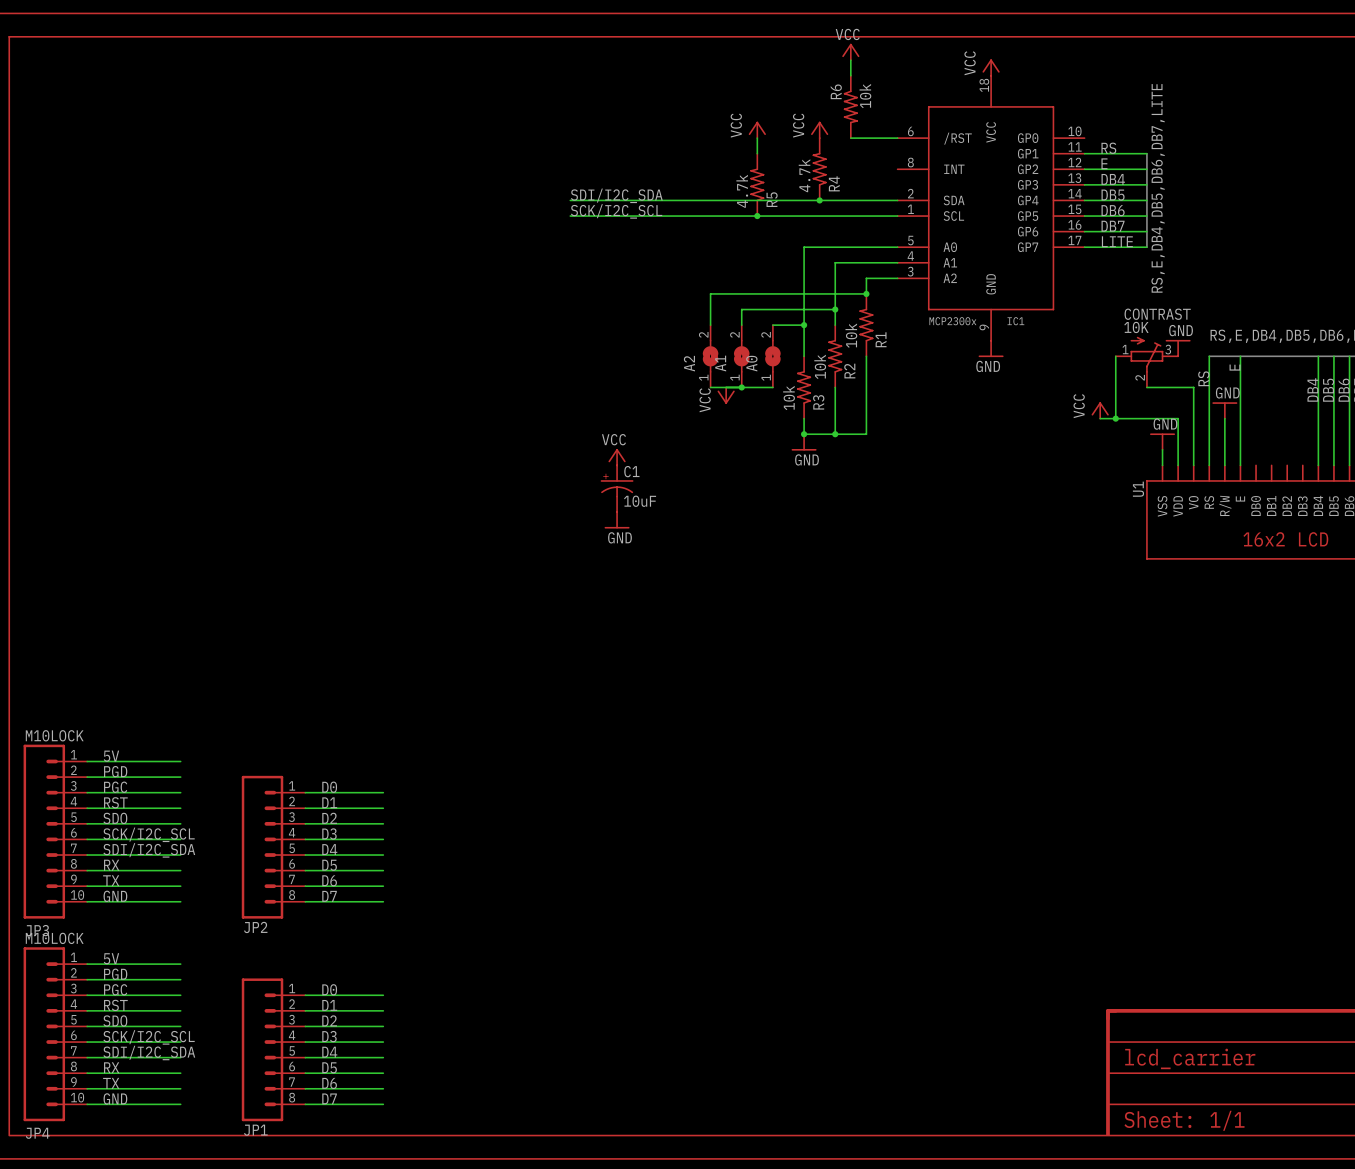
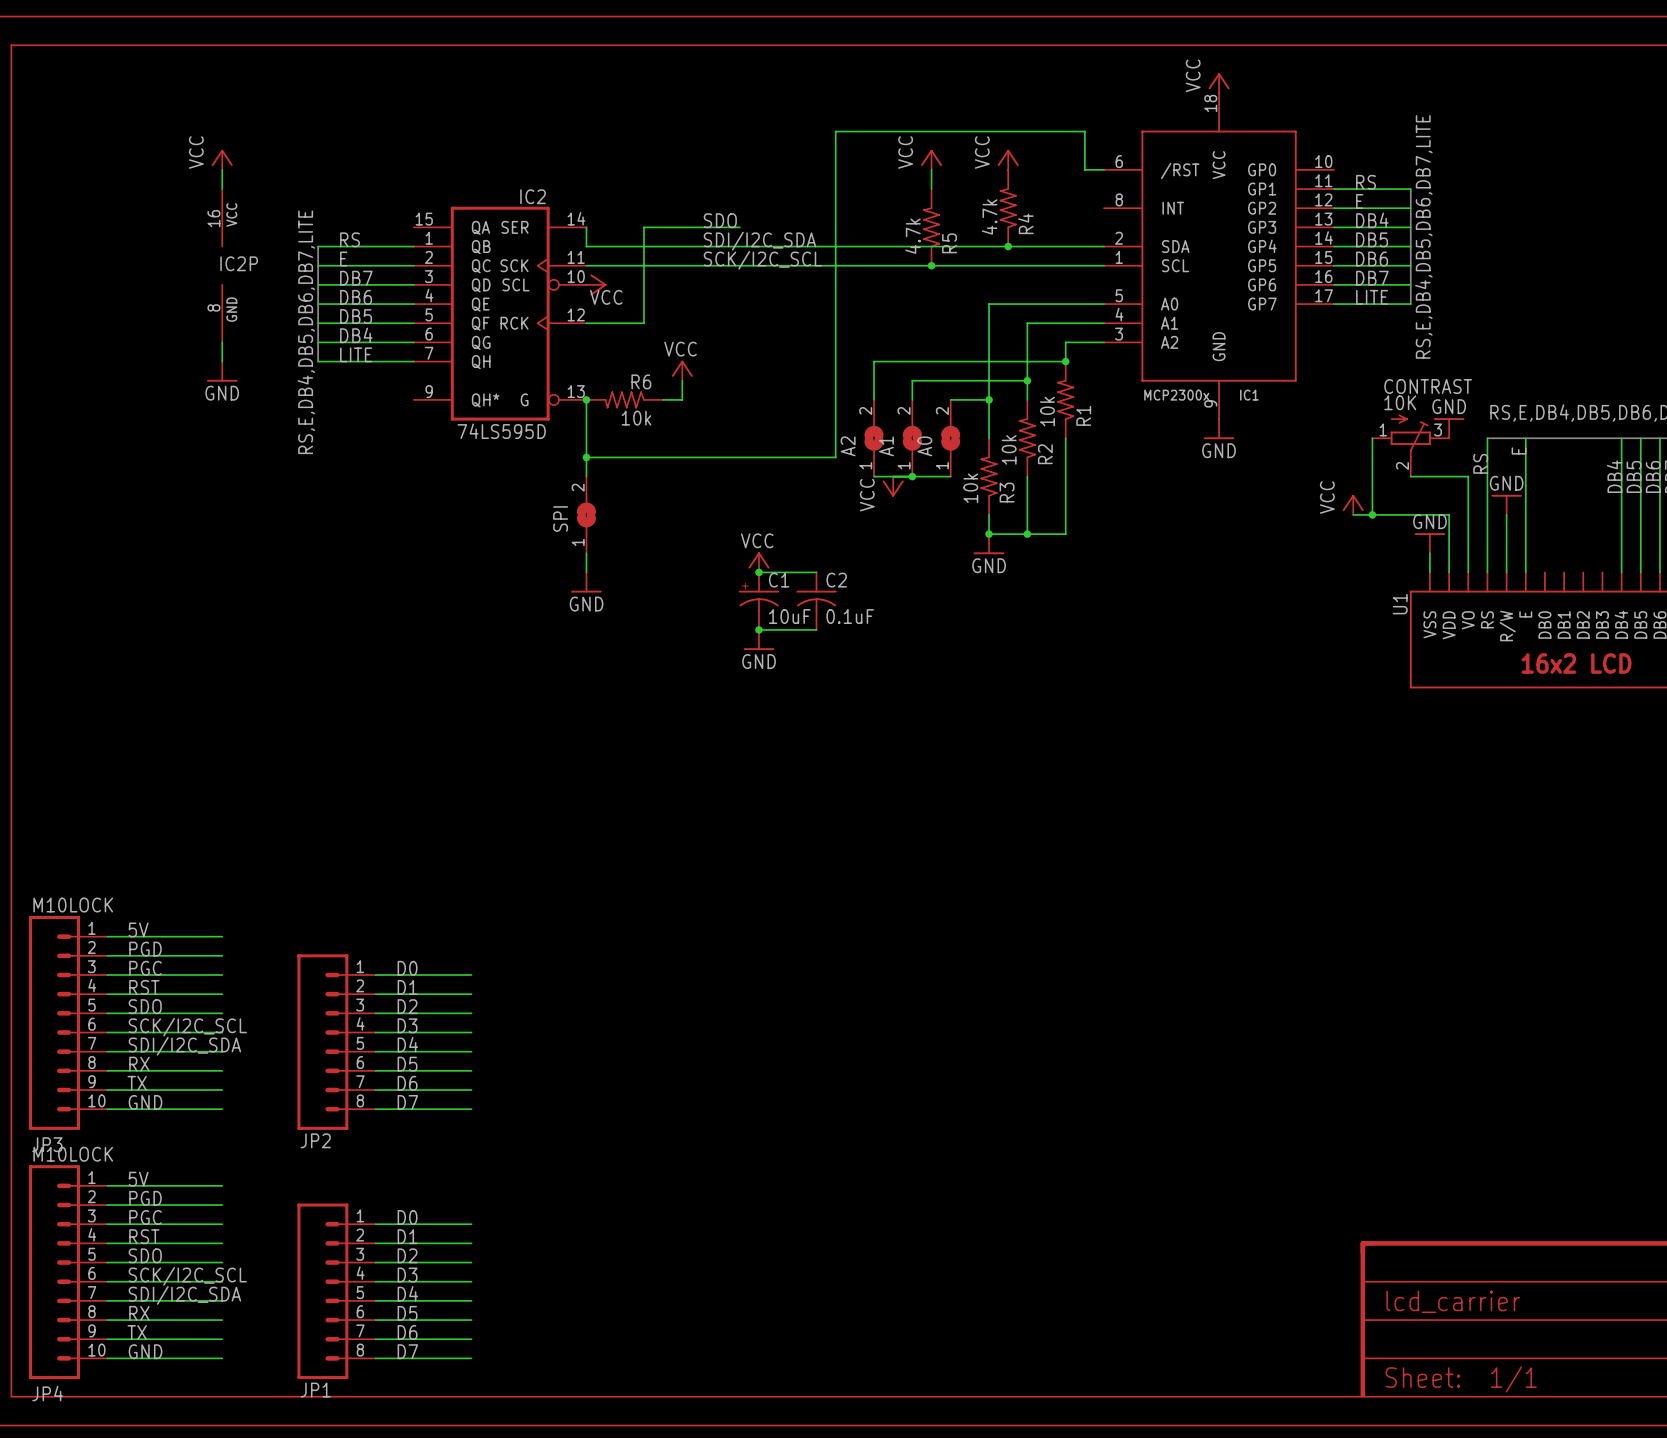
power symbol: VCC (850, 52) -> none
wire: (850, 60) (850, 75) -> none
R6 rotation: 0° (850, 106) -> 90° clockwise (624, 399)
R6 position: (850, 106) -> (624, 399)
power symbol: none -> VCC (222, 159)
wire: none -> (222, 169) (222, 189)
wire: (850, 138) (882, 138) -> (586, 457) (835, 457) (835, 131) (1084, 131) (1084, 169)
label: none -> SDO (720, 220)
wire: none -> (586, 227) (586, 246) (701, 246)
wire: none -> (739, 227) (643, 227) (643, 323) (586, 323)
label: none -> RS (350, 239)
bus: none -> (318, 246) (318, 361)
wire: none -> (318, 246) (413, 246)
label: none -> E (343, 259)
IC2P: none -> (222, 265)
wire: none -> (318, 265) (413, 265)
wire: none -> (586, 265) (701, 265)
label: none -> DB7 (356, 278)
wire: none -> (318, 284) (413, 284)
power symbol: none -> VCC (596, 284)
label: none -> DB6 (356, 297)
wire: none -> (318, 304) (413, 304)
IC2: none -> 74LS595D (500, 313)
label: none -> DB5 (356, 316)
wire: none -> (318, 323) (413, 323)
label: none -> DB4 (356, 335)
label: none -> RS,E,DB4,DB5,DB6,DB7,LITE (306, 332)
wire: none -> (222, 342) (222, 361)
wire: none -> (318, 342) (413, 342)
label: none -> LITE (356, 354)
wire: none -> (318, 361) (413, 361)
power symbol: none -> VCC (682, 370)
power symbol: none -> GND (222, 371)
wire: none -> (682, 380) (682, 399) (663, 399)
wire: none -> (586, 399) (586, 476)
junction: none -> (586, 399)
junction: none -> (586, 457)
SPI: none -> (586, 514)
wire: none -> (586, 553) (586, 572)
wire: none -> (758, 572) (816, 572)
junction: none -> (758, 572)
power symbol: none -> GND (586, 582)
C2: none -> 0.1uF (816, 601)
wire: none -> (758, 629) (816, 629)
junction: none -> (758, 629)

